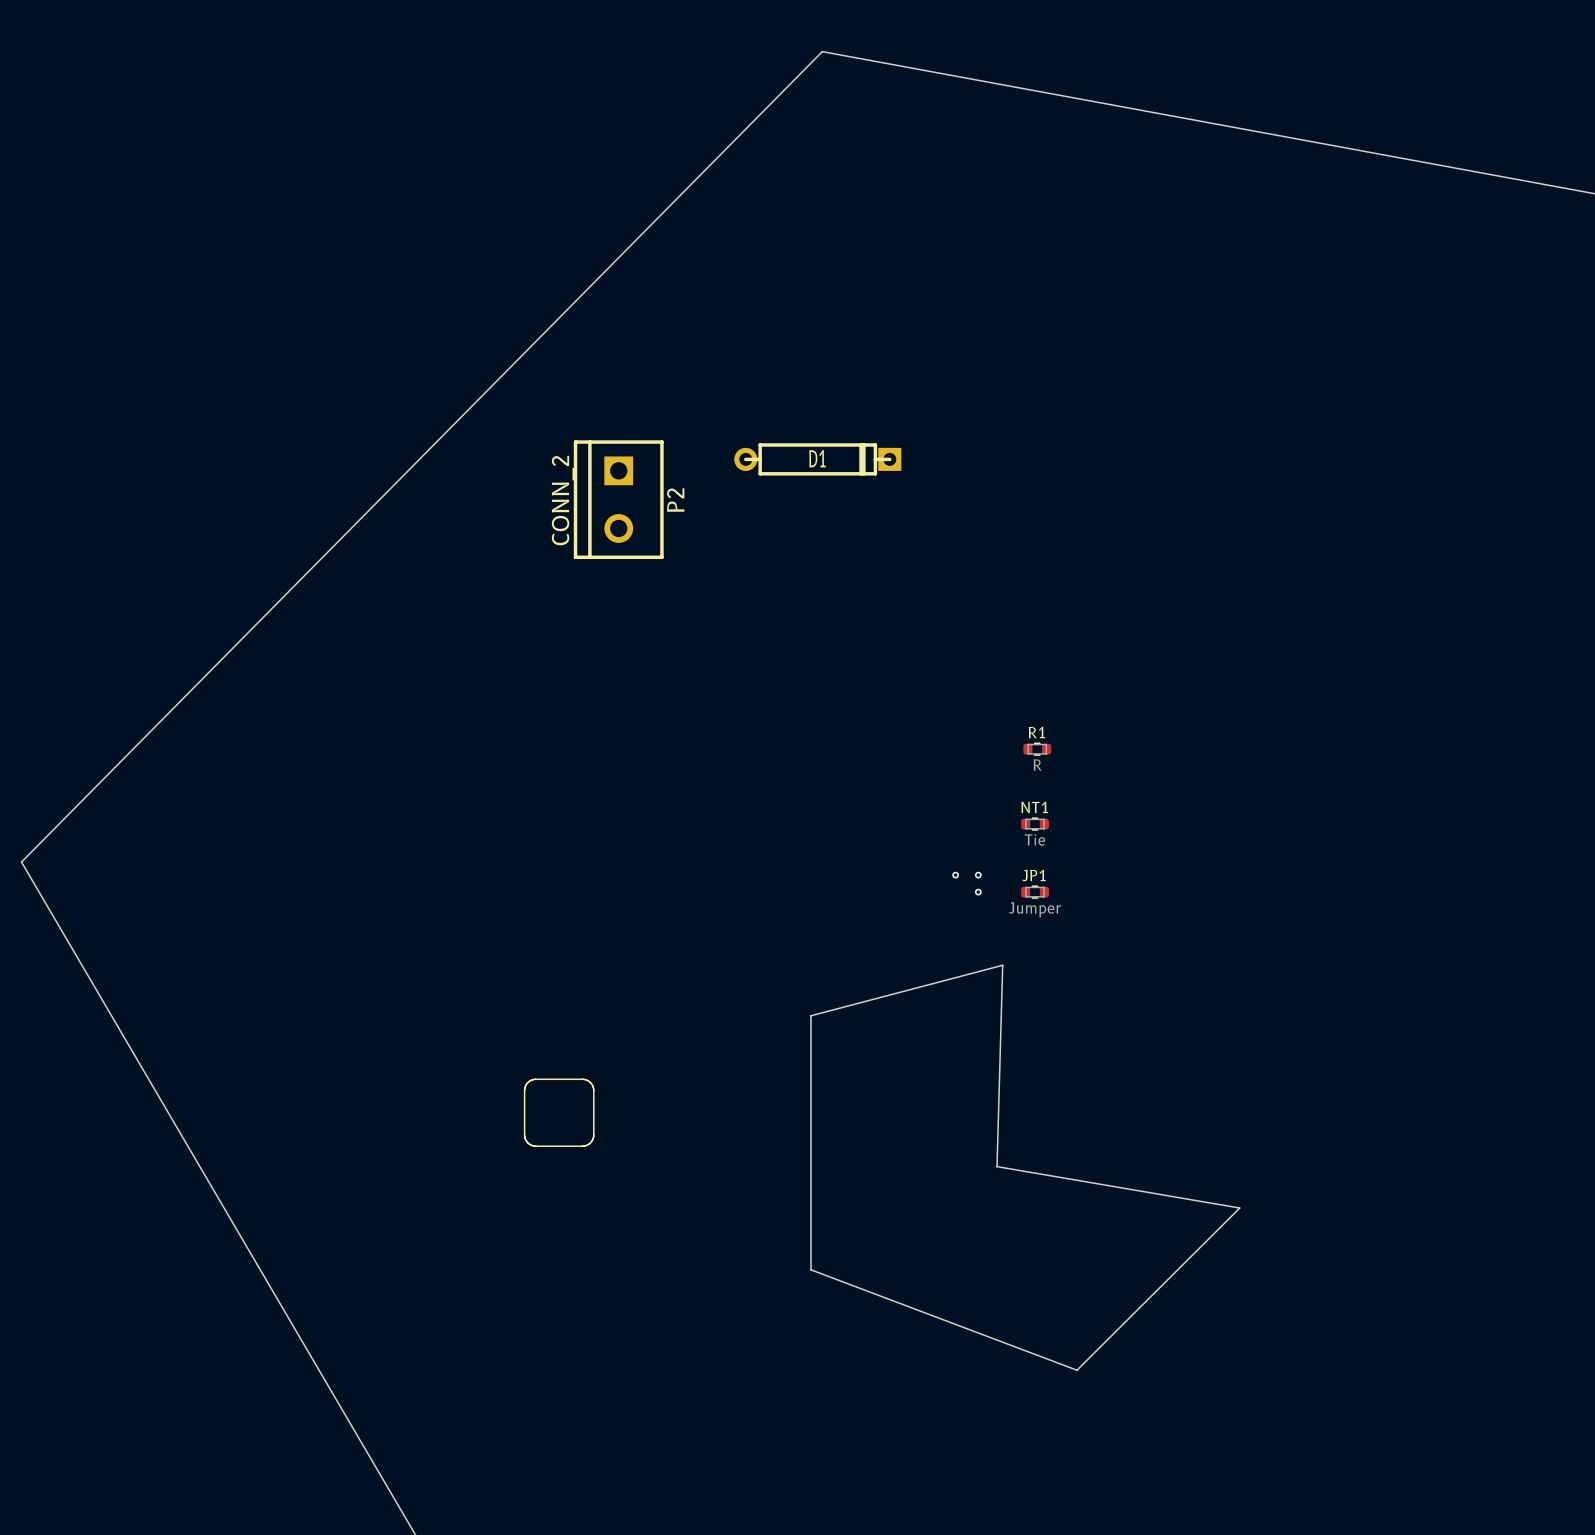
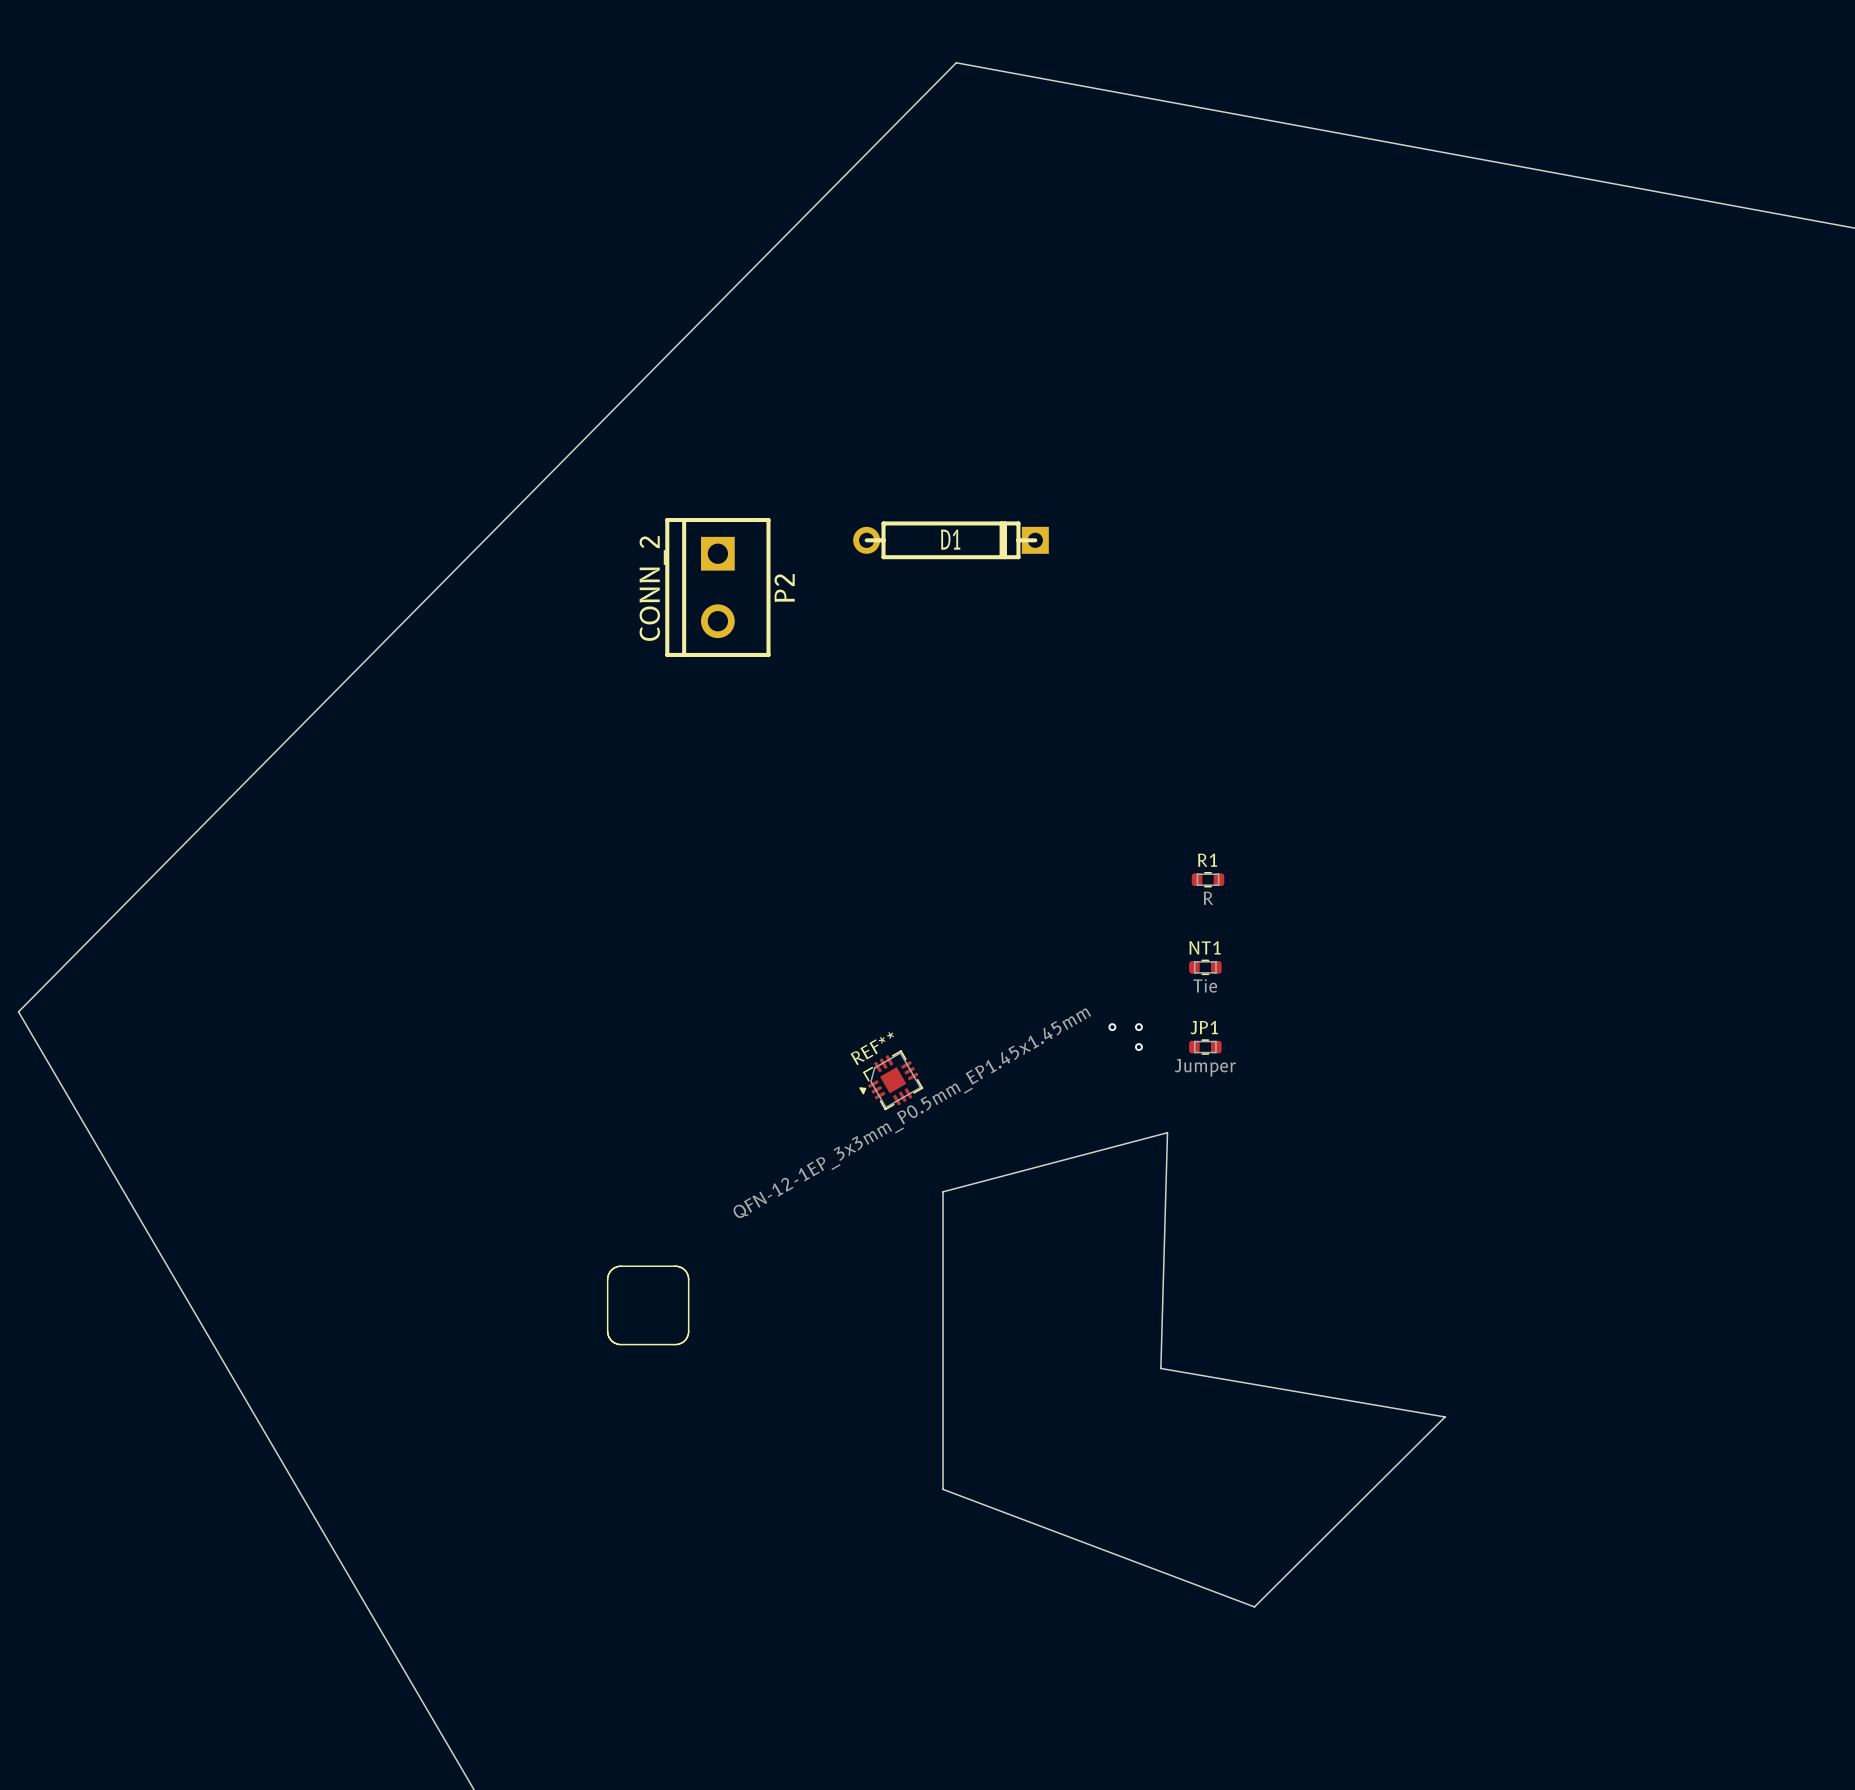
REF**: none -> QFN-12-1EP_3x3mm_P0.5mm_EP1.45x1.45mm (891, 1080)

